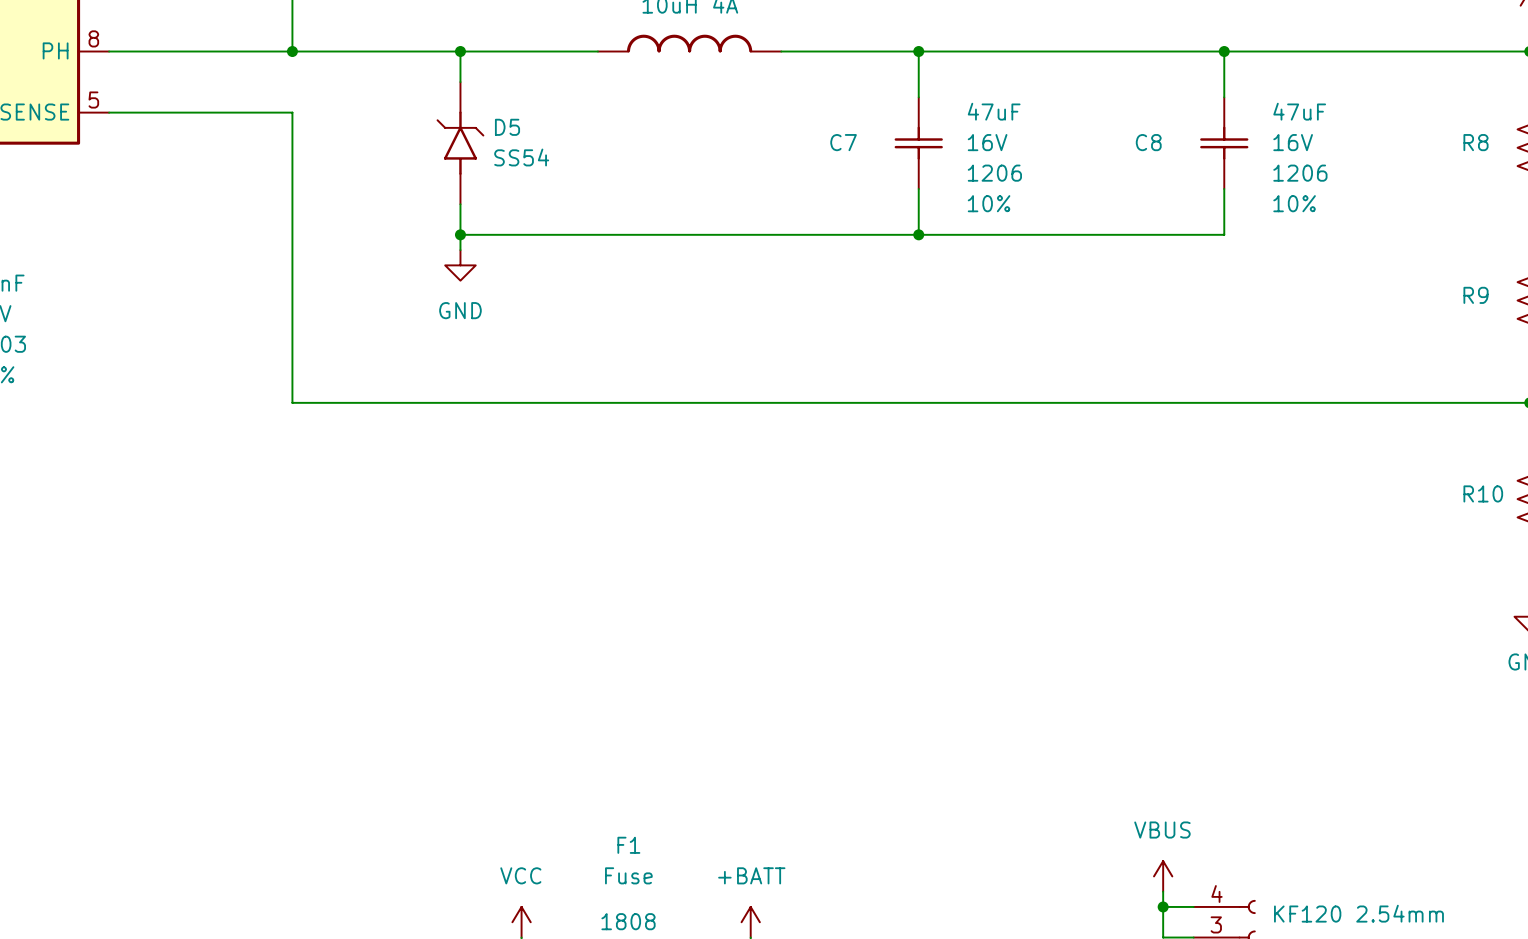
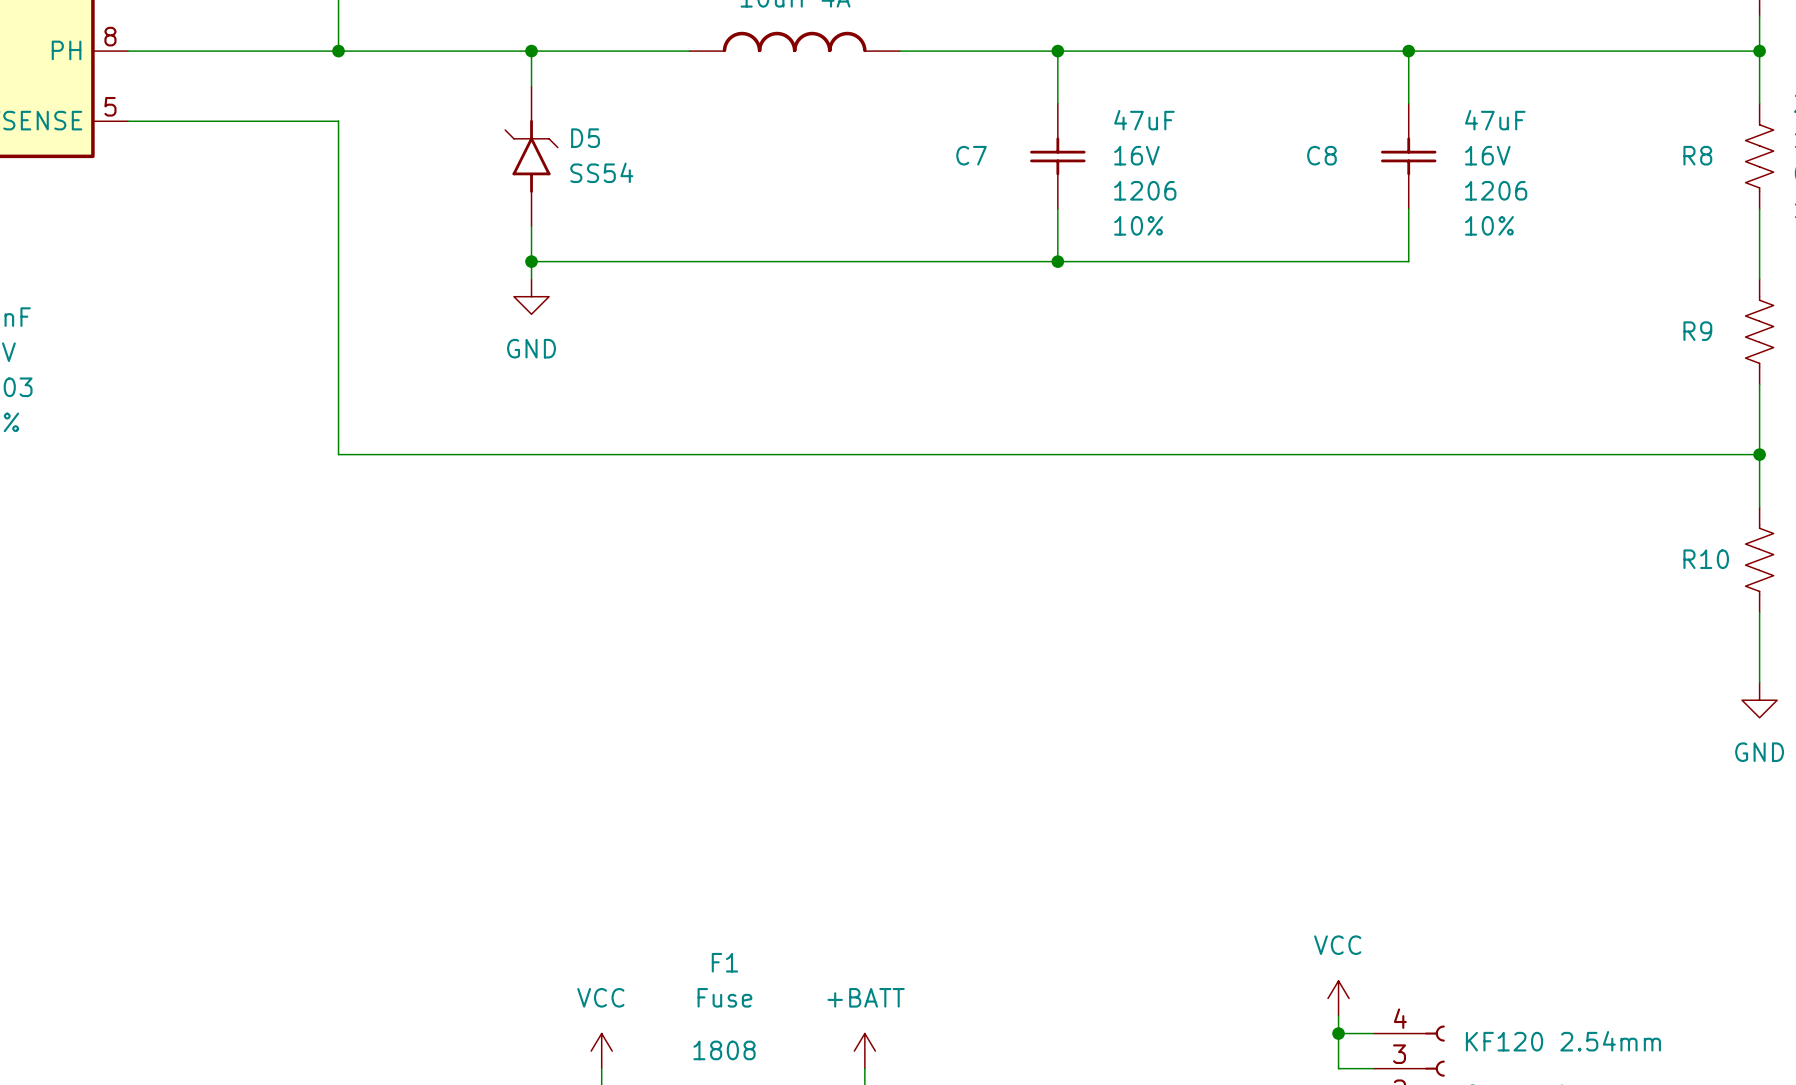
power symbol: VBUS (1163, 876) -> VCC (1338, 998)

